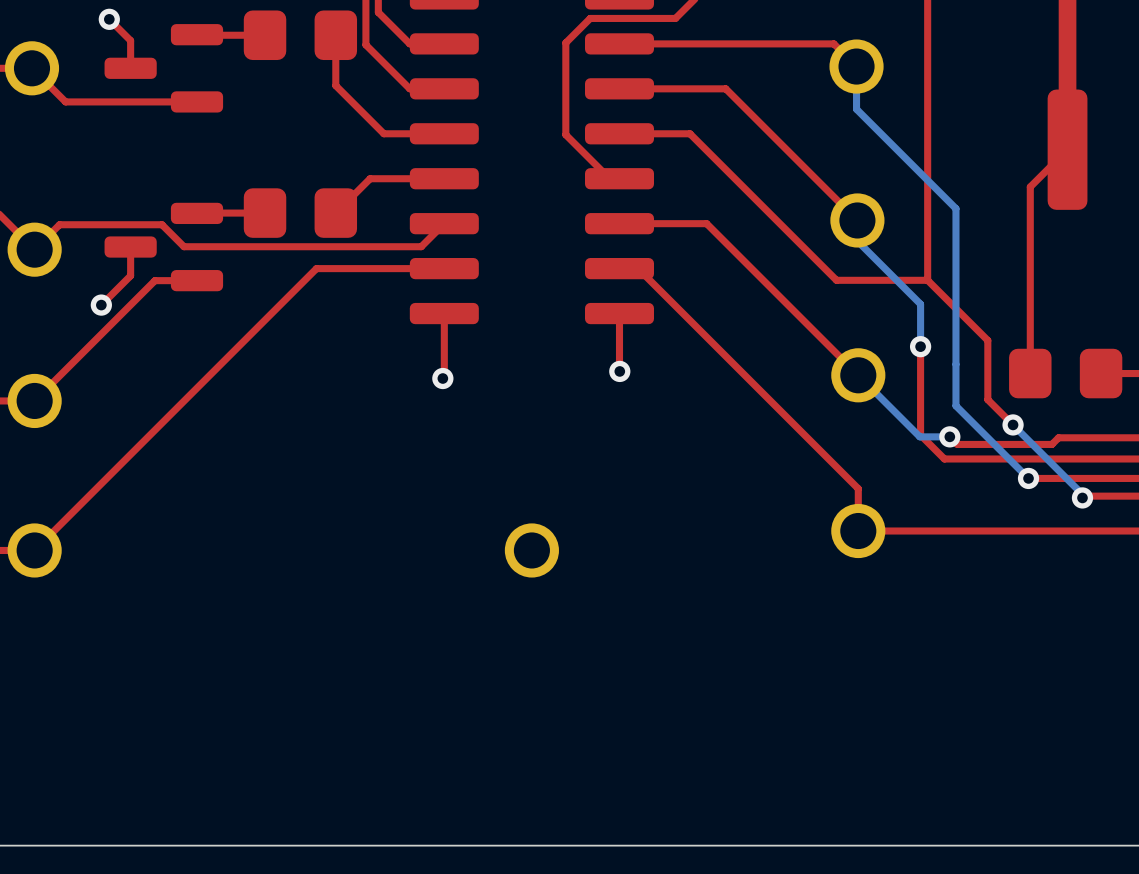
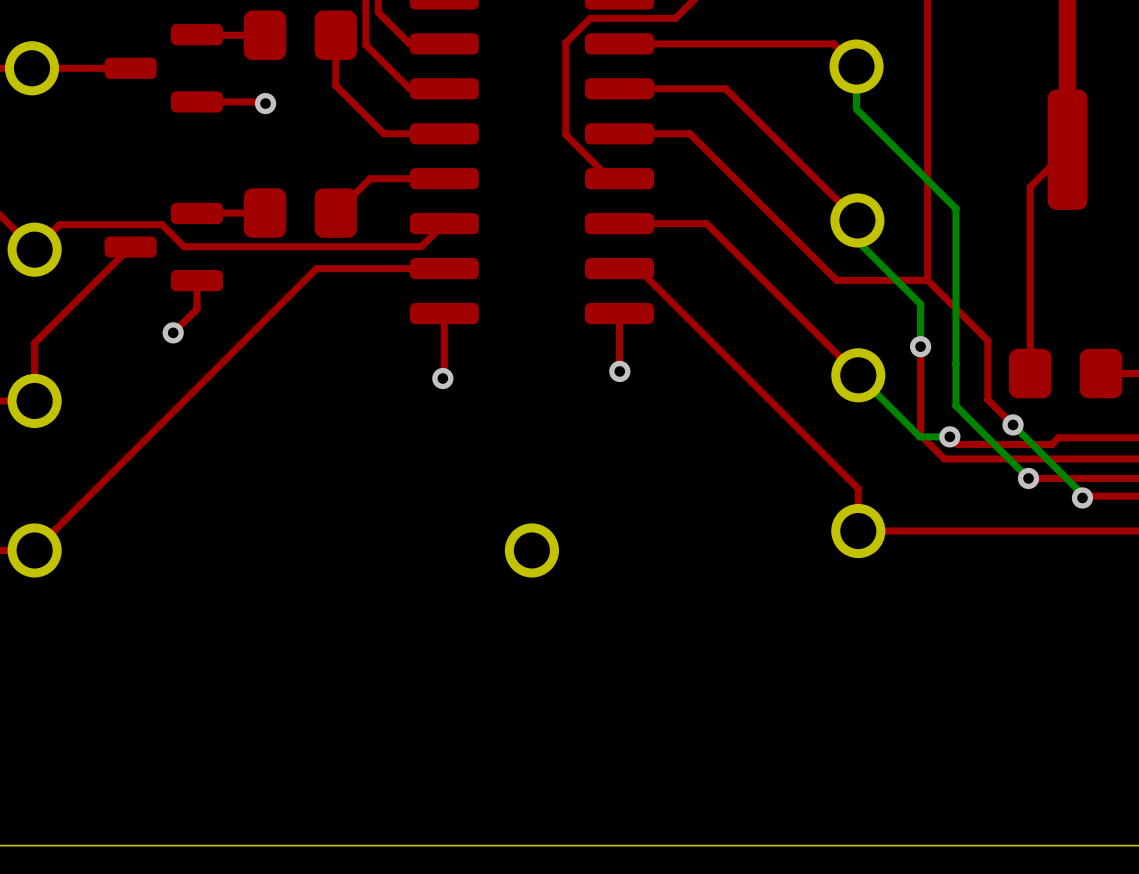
top track: (109, 19) (130, 40) (130, 68) -> none
via: (109, 19) -> none
top track: (31, 68) (65, 101) (196, 101) -> (31, 68) (130, 68)
top track: none -> (196, 101) (263, 101) (265, 103)
via: none -> (265, 103)
top track: (130, 247) (130, 275) (101, 305) -> none
top track: (196, 280) (154, 280) (34, 400) -> (130, 247) (34, 343) (34, 400)
top track: none -> (196, 280) (196, 309) (173, 332)
via position: (101, 305) -> (173, 332)

